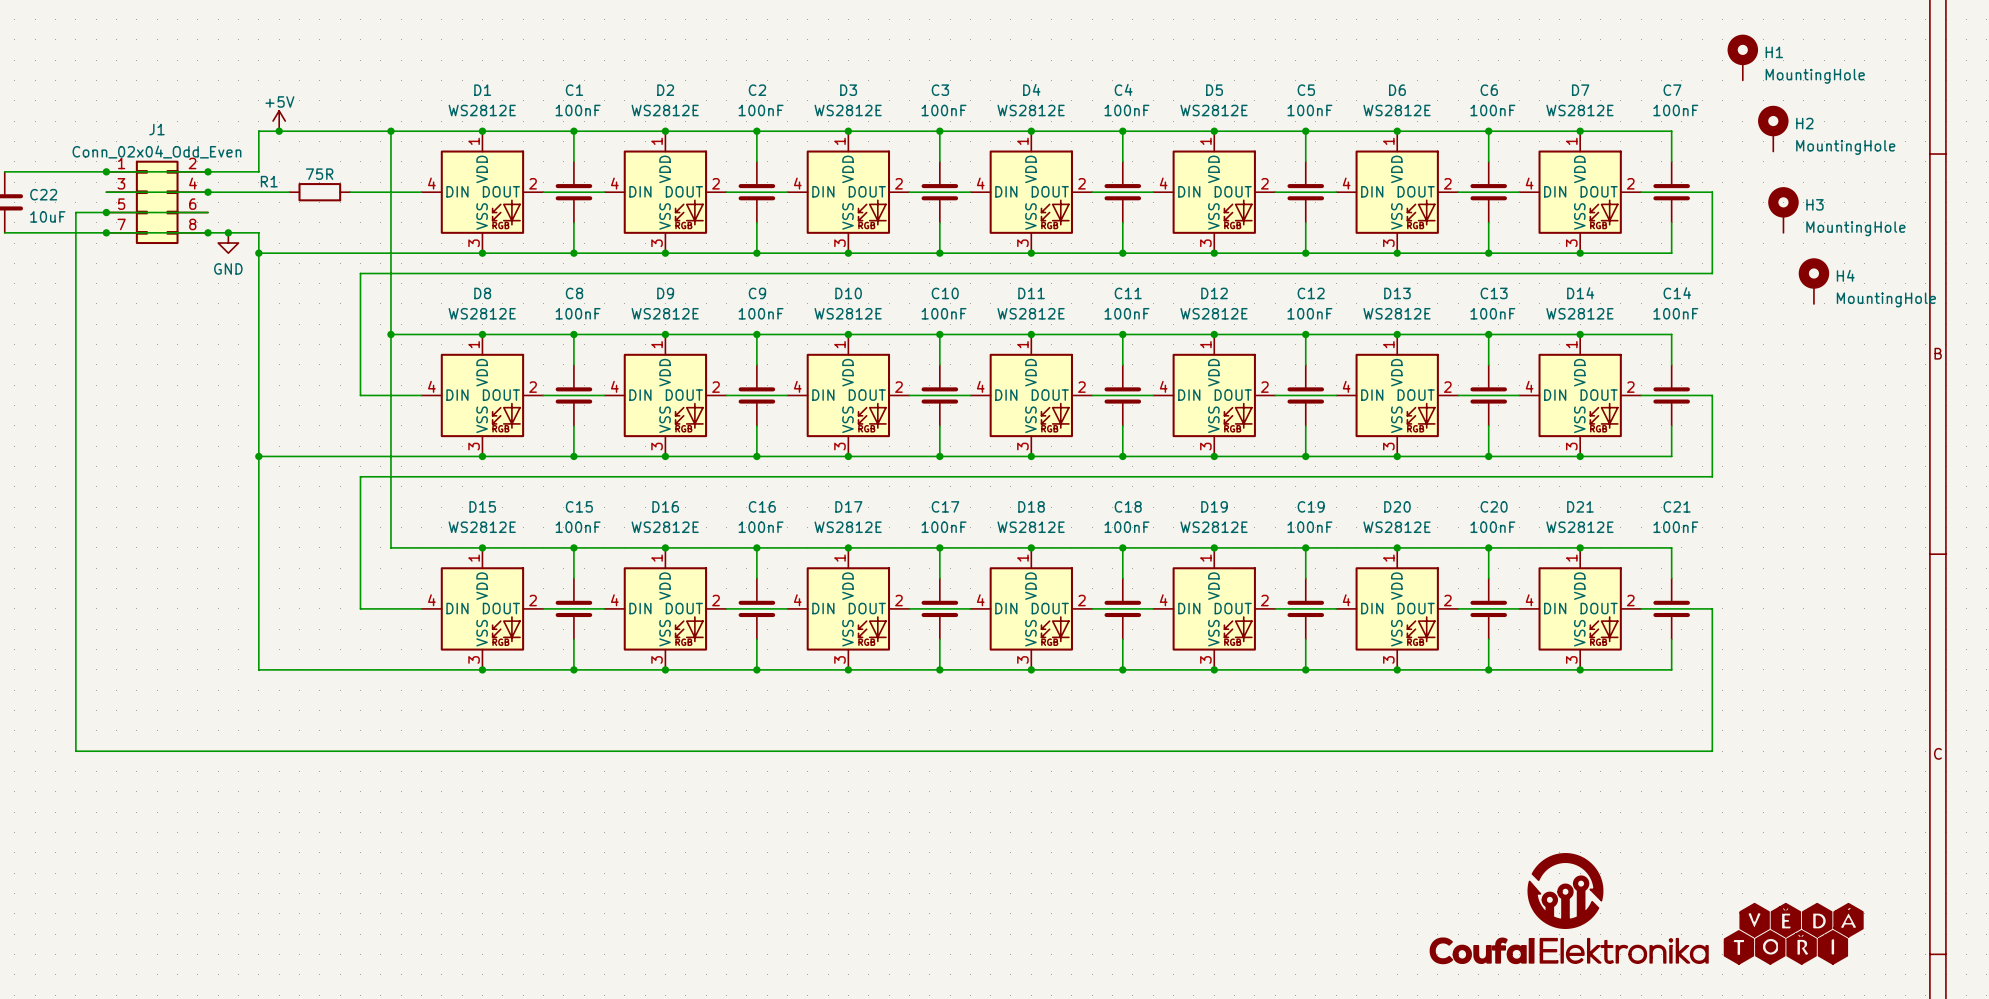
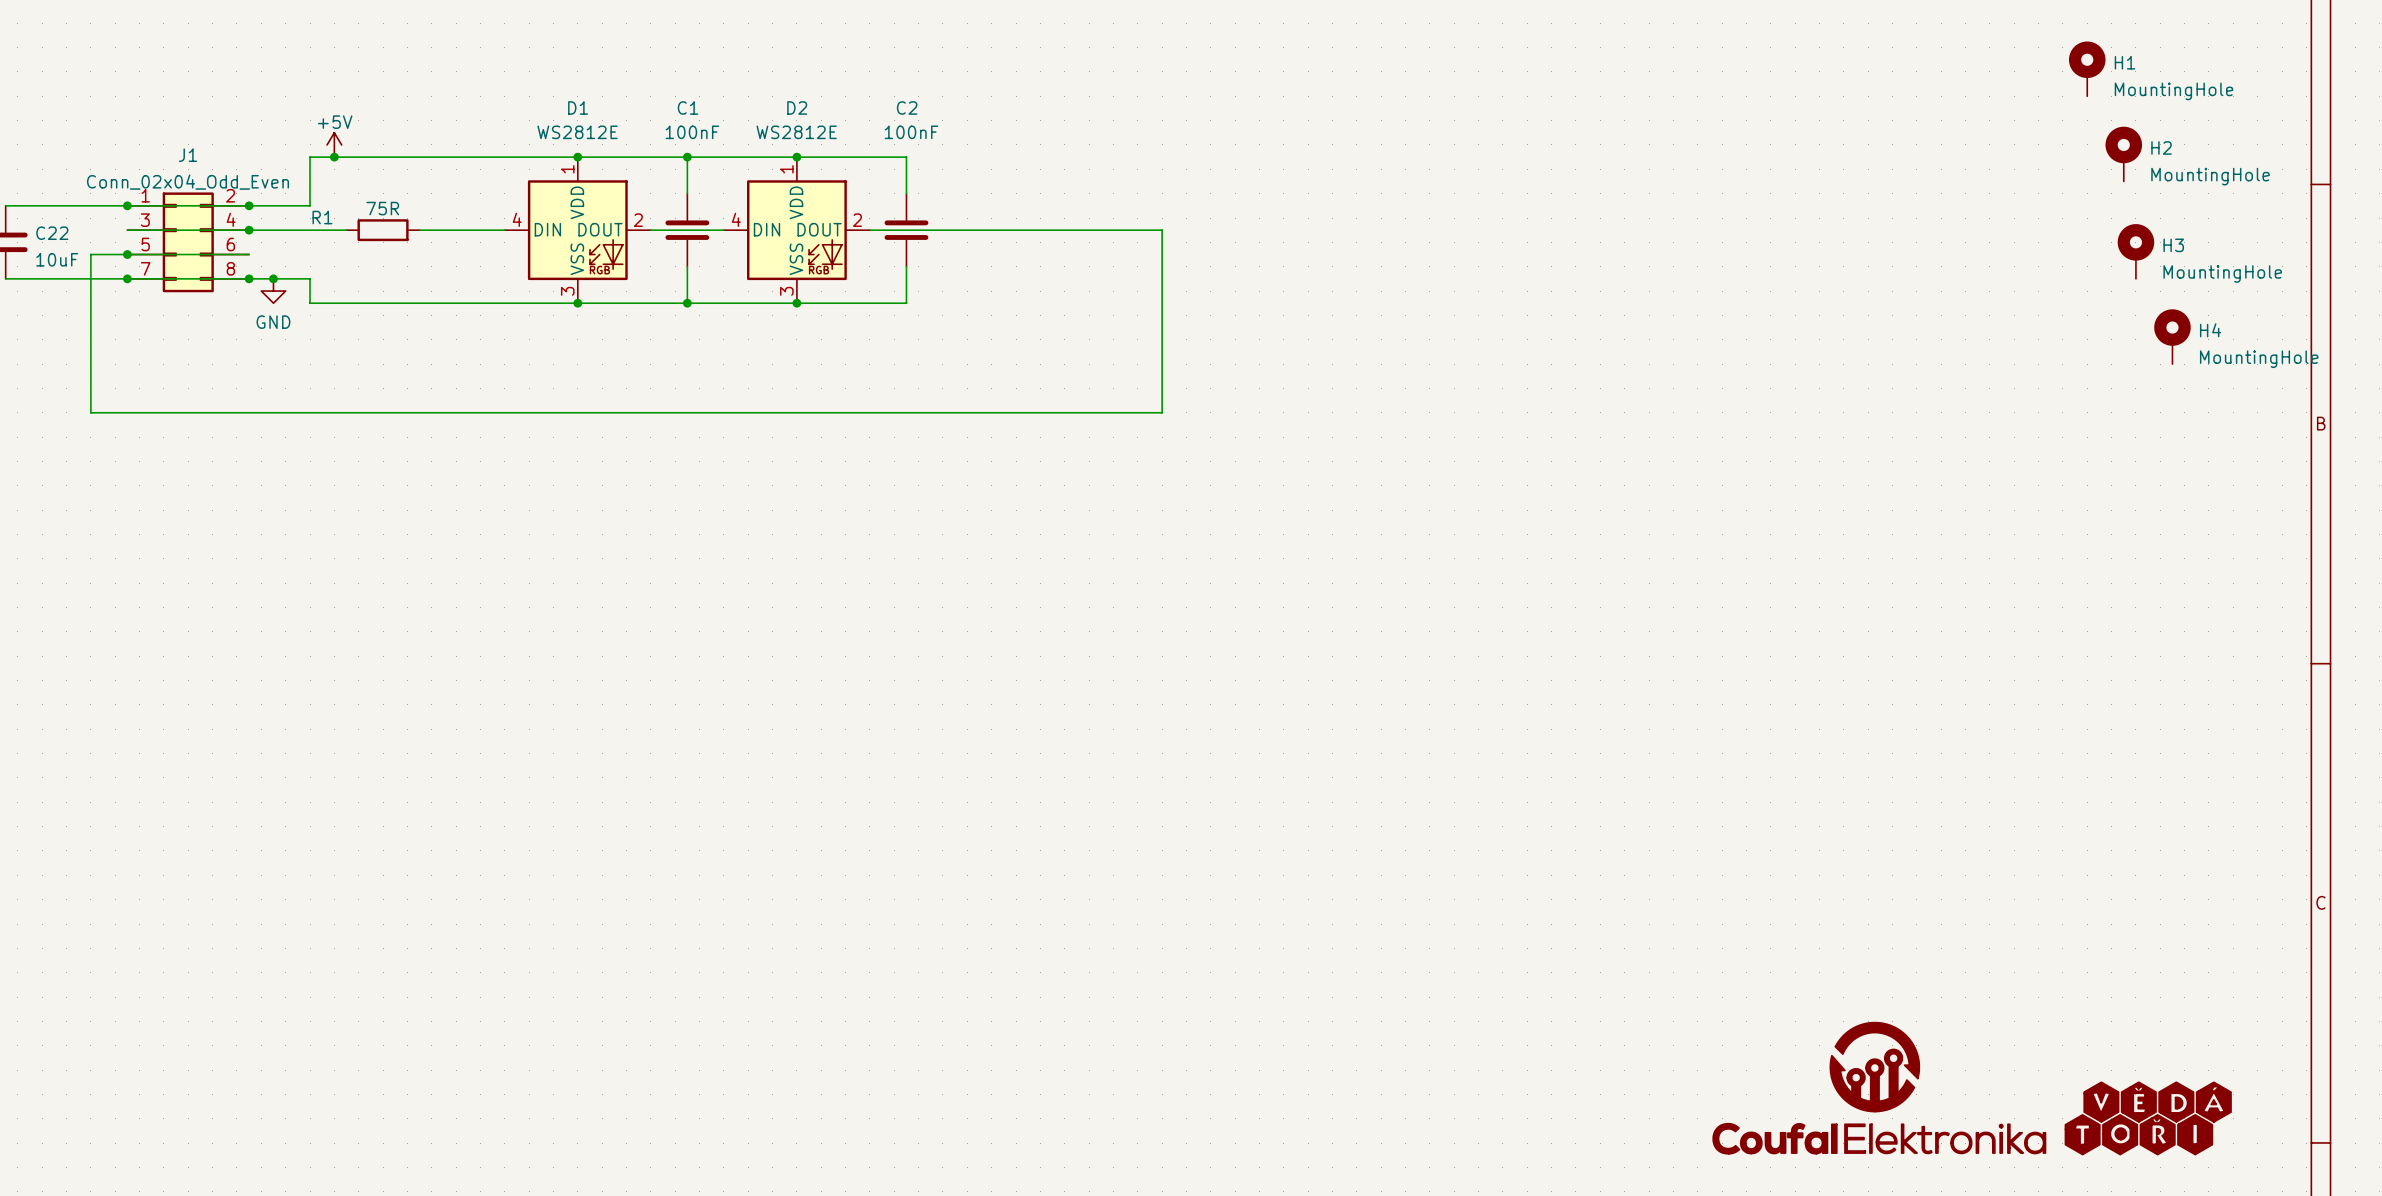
wire: (390, 131) (390, 547) (1671, 547) (1671, 578) -> none
junction: (390, 131) -> none
wire: (756, 131) (1671, 131) (1671, 161) -> none
junction: (756, 131) -> none
junction: (848, 131) -> none
wire: (939, 131) (939, 161) -> none
junction: (939, 131) -> none
junction: (1031, 131) -> none
wire: (1122, 131) (1122, 161) -> none
junction: (1122, 131) -> none
junction: (1214, 131) -> none
wire: (1305, 131) (1305, 161) -> none
junction: (1305, 131) -> none
junction: (1397, 131) -> none
wire: (1488, 131) (1488, 161) -> none
junction: (1488, 131) -> none
junction: (1580, 131) -> none
D3: WS2812E (848, 192) -> none
C3: 100nF (939, 192) -> none
D4: WS2812E (1031, 192) -> none
wire: (1092, 192) (1153, 192) -> none
C4: 100nF (1122, 192) -> none
D5: WS2812E (1214, 192) -> none
wire: (1275, 192) (1336, 192) -> none
C5: 100nF (1305, 192) -> none
D6: WS2812E (1397, 192) -> none
wire: (1458, 192) (1519, 192) -> none
C6: 100nF (1488, 192) -> none
D7: WS2812E (1580, 192) -> none
wire: (1641, 192) (1712, 192) (1712, 273) (360, 273) (360, 395) (421, 395) -> none
C7: 100nF (1671, 192) -> none
wire: (939, 222) (939, 253) -> none
wire: (1122, 222) (1122, 253) -> none
wire: (1305, 222) (1305, 253) -> none
wire: (1488, 222) (1488, 253) -> none
wire: (1671, 222) (1671, 253) (756, 253) -> none
wire: (258, 253) (258, 669) (1671, 669) (1671, 639) -> none
junction: (258, 253) -> none
junction: (756, 253) -> none
junction: (848, 253) -> none
junction: (939, 253) -> none
junction: (1031, 253) -> none
junction: (1122, 253) -> none
junction: (1214, 253) -> none
junction: (1305, 253) -> none
junction: (1397, 253) -> none
junction: (1488, 253) -> none
junction: (1580, 253) -> none
wire: (390, 334) (1671, 334) (1671, 364) -> none
junction: (390, 334) -> none
junction: (482, 334) -> none
wire: (573, 334) (573, 364) -> none
junction: (573, 334) -> none
junction: (665, 334) -> none
wire: (756, 334) (756, 364) -> none
junction: (756, 334) -> none
junction: (848, 334) -> none
wire: (939, 334) (939, 364) -> none
junction: (939, 334) -> none
junction: (1031, 334) -> none
wire: (1122, 334) (1122, 364) -> none
junction: (1122, 334) -> none
junction: (1214, 334) -> none
wire: (1305, 334) (1305, 364) -> none
junction: (1305, 334) -> none
junction: (1397, 334) -> none
wire: (1488, 334) (1488, 364) -> none
junction: (1488, 334) -> none
junction: (1580, 334) -> none
wire: (75, 344) (75, 751) (1712, 751) (1712, 608) (1641, 608) -> (90, 412) (1162, 412) (1162, 230)
D8: WS2812E (482, 395) -> none
wire: (543, 395) (604, 395) -> none
C8: 100nF (573, 395) -> none
D9: WS2812E (665, 395) -> none
wire: (726, 395) (787, 395) -> none
C9: 100nF (756, 395) -> none
D10: WS2812E (848, 395) -> none
wire: (909, 395) (970, 395) -> none
C10: 100nF (939, 395) -> none
D11: WS2812E (1031, 395) -> none
wire: (1092, 395) (1153, 395) -> none
C11: 100nF (1122, 395) -> none
D12: WS2812E (1214, 395) -> none
wire: (1275, 395) (1336, 395) -> none
C12: 100nF (1305, 395) -> none
D13: WS2812E (1397, 395) -> none
wire: (1458, 395) (1519, 395) -> none
C13: 100nF (1488, 395) -> none
D14: WS2812E (1580, 395) -> none
wire: (1641, 395) (1712, 395) (1712, 476) (360, 476) (360, 608) (421, 608) -> none
C14: 100nF (1671, 395) -> none
wire: (573, 425) (573, 456) -> none
wire: (756, 425) (756, 456) -> none
wire: (939, 425) (939, 456) -> none
wire: (1122, 425) (1122, 456) -> none
wire: (1305, 425) (1305, 456) -> none
wire: (1488, 425) (1488, 456) -> none
wire: (1671, 425) (1671, 456) (258, 456) -> none
junction: (258, 456) -> none
junction: (482, 456) -> none
junction: (573, 456) -> none
junction: (665, 456) -> none
junction: (756, 456) -> none
junction: (848, 456) -> none
junction: (939, 456) -> none
junction: (1031, 456) -> none
junction: (1122, 456) -> none
junction: (1214, 456) -> none
junction: (1305, 456) -> none
junction: (1397, 456) -> none
junction: (1488, 456) -> none
junction: (1580, 456) -> none
junction: (482, 547) -> none
wire: (573, 547) (573, 578) -> none
junction: (573, 547) -> none
junction: (665, 547) -> none
wire: (756, 547) (756, 578) -> none
junction: (756, 547) -> none
junction: (848, 547) -> none
wire: (939, 547) (939, 578) -> none
junction: (939, 547) -> none
junction: (1031, 547) -> none
wire: (1122, 547) (1122, 578) -> none
junction: (1122, 547) -> none
junction: (1214, 547) -> none
wire: (1305, 547) (1305, 578) -> none
junction: (1305, 547) -> none
junction: (1397, 547) -> none
wire: (1488, 547) (1488, 578) -> none
junction: (1488, 547) -> none
junction: (1580, 547) -> none
D15: WS2812E (482, 608) -> none
wire: (543, 608) (604, 608) -> none
C15: 100nF (573, 608) -> none
D16: WS2812E (665, 608) -> none
wire: (726, 608) (787, 608) -> none
C16: 100nF (756, 608) -> none
D17: WS2812E (848, 608) -> none
wire: (909, 608) (970, 608) -> none
C17: 100nF (939, 608) -> none
D18: WS2812E (1031, 608) -> none
wire: (1092, 608) (1153, 608) -> none
C18: 100nF (1122, 608) -> none
D19: WS2812E (1214, 608) -> none
wire: (1275, 608) (1336, 608) -> none
C19: 100nF (1305, 608) -> none
D20: WS2812E (1397, 608) -> none
wire: (1458, 608) (1519, 608) -> none
C20: 100nF (1488, 608) -> none
D21: WS2812E (1580, 608) -> none
C21: 100nF (1671, 608) -> none
wire: (573, 639) (573, 669) -> none
wire: (756, 639) (756, 669) -> none
wire: (939, 639) (939, 669) -> none
wire: (1122, 639) (1122, 669) -> none
wire: (1305, 639) (1305, 669) -> none
wire: (1488, 639) (1488, 669) -> none
junction: (482, 669) -> none
junction: (573, 669) -> none
junction: (665, 669) -> none
junction: (756, 669) -> none
junction: (848, 669) -> none
junction: (939, 669) -> none
junction: (1031, 669) -> none
junction: (1122, 669) -> none
junction: (1214, 669) -> none
junction: (1305, 669) -> none
junction: (1397, 669) -> none
junction: (1488, 669) -> none
junction: (1580, 669) -> none

